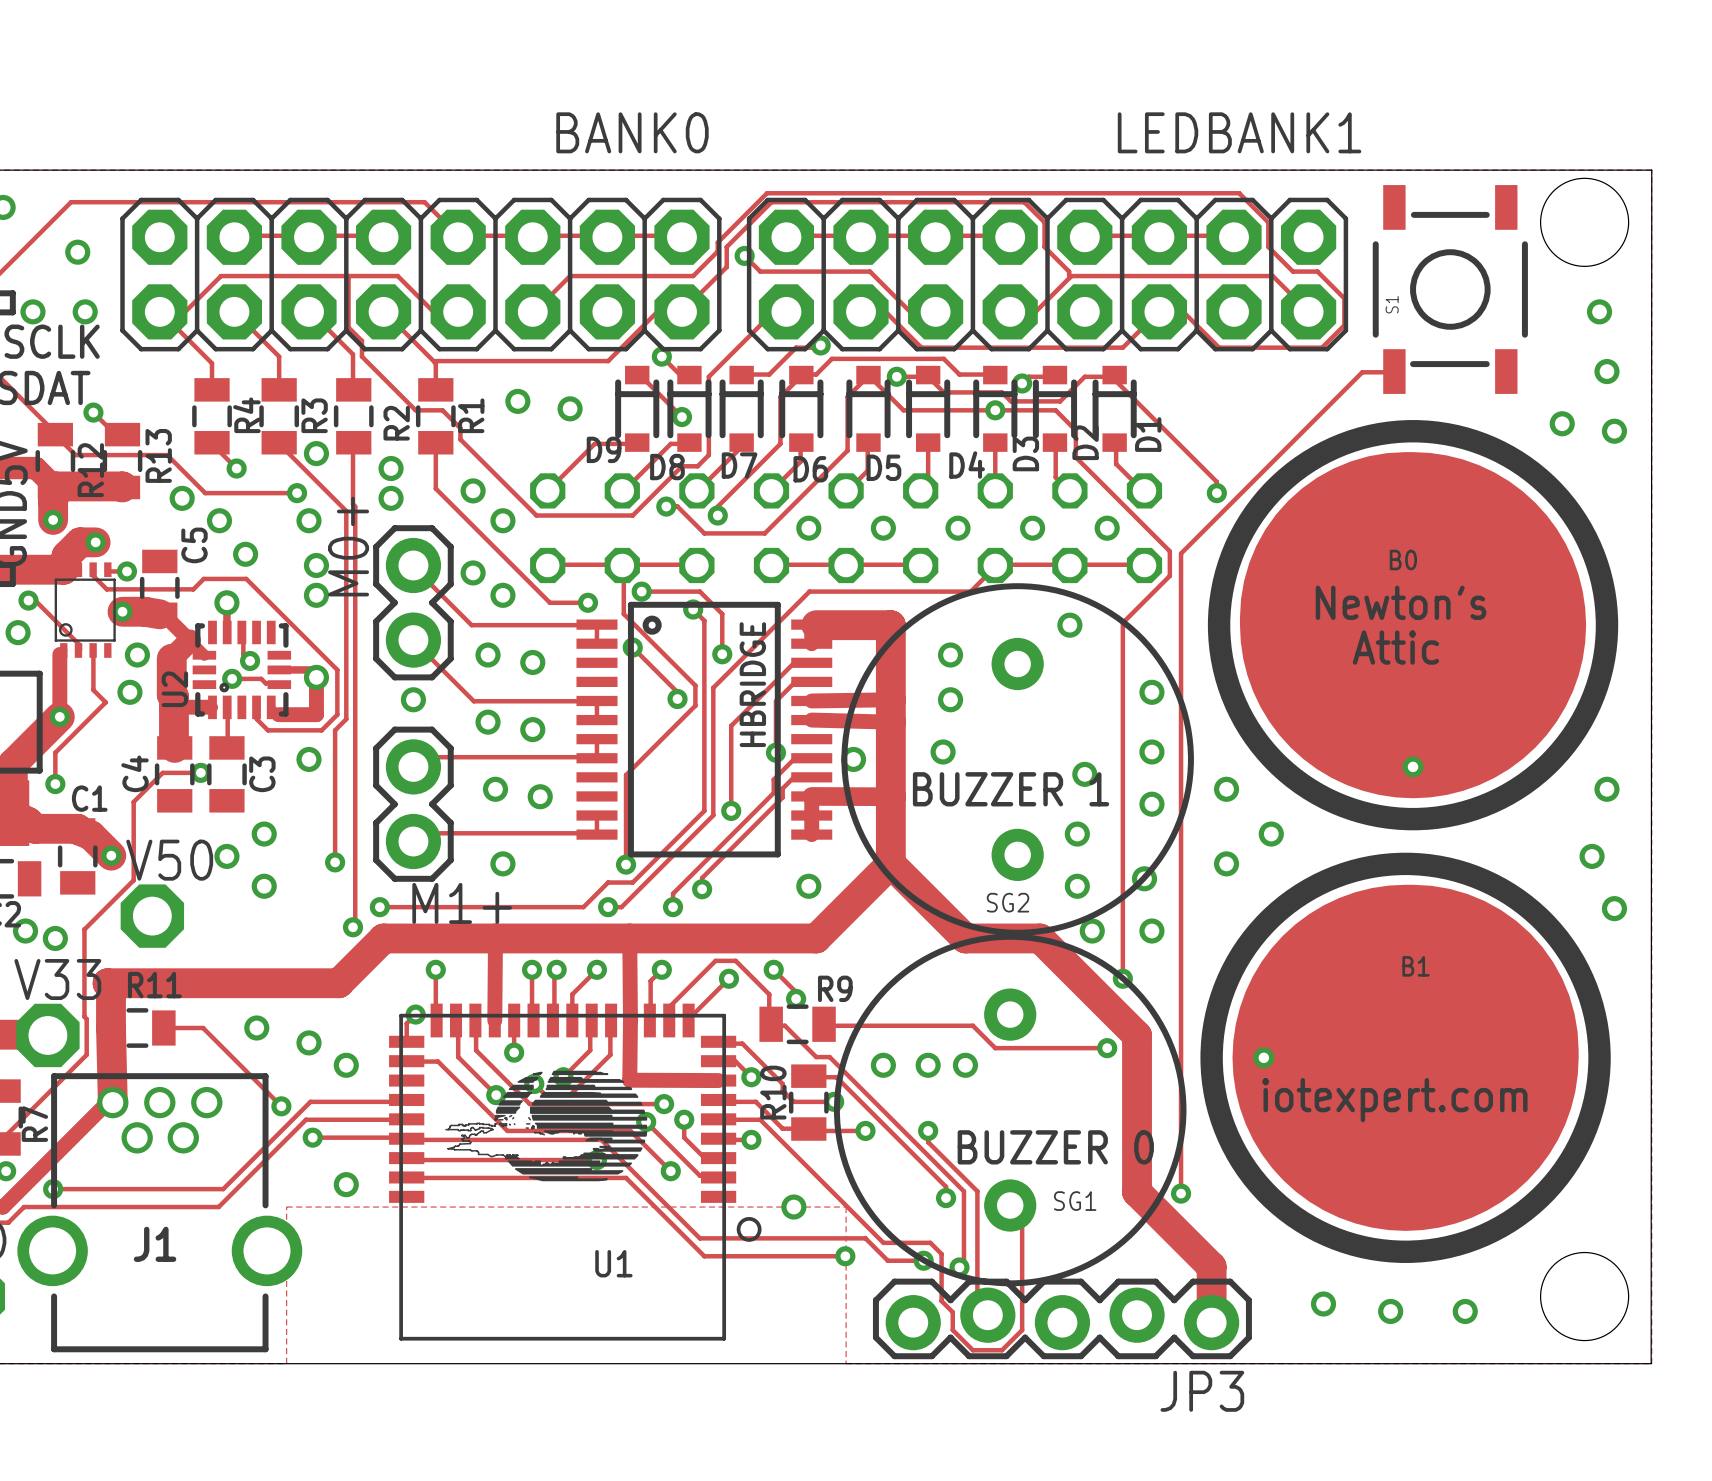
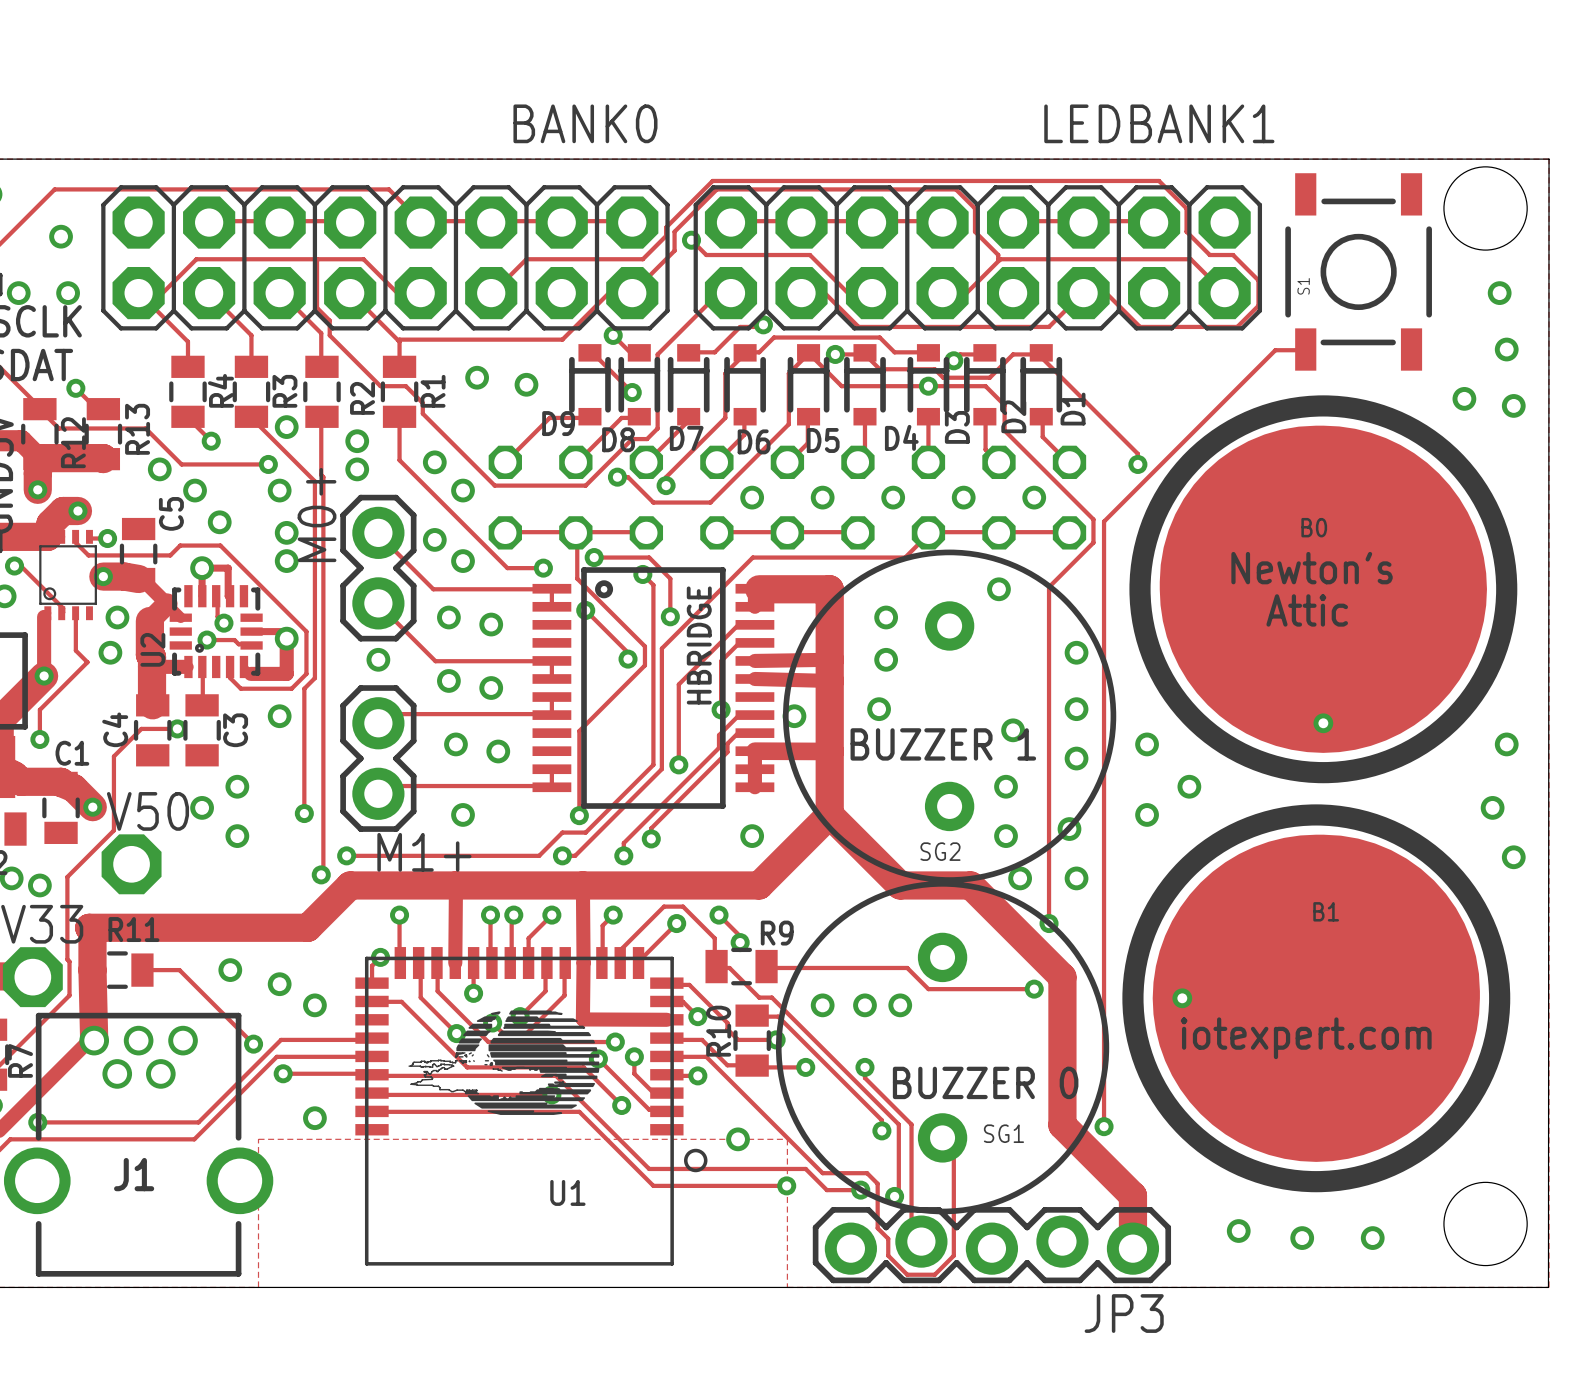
track: none -> (202, 568) (228, 568) (228, 596) (230, 596)

